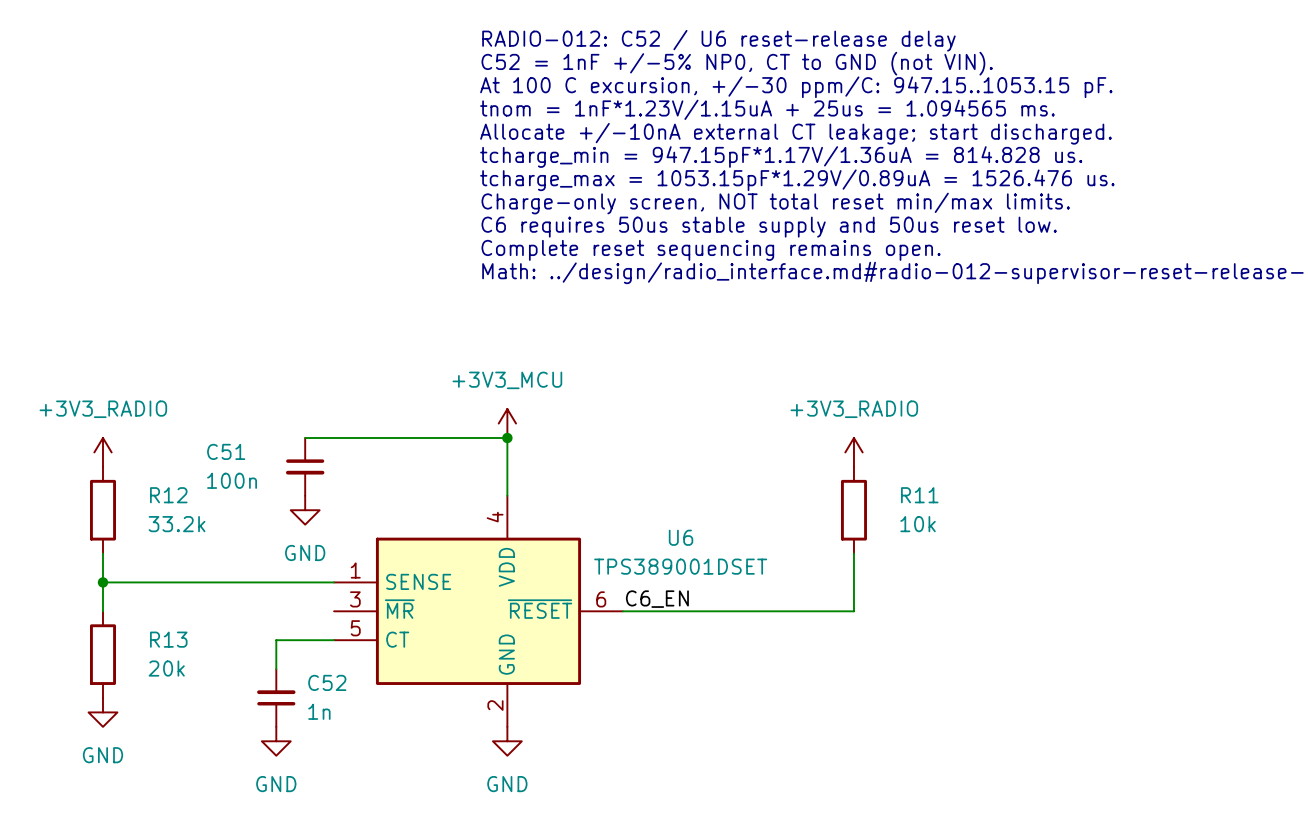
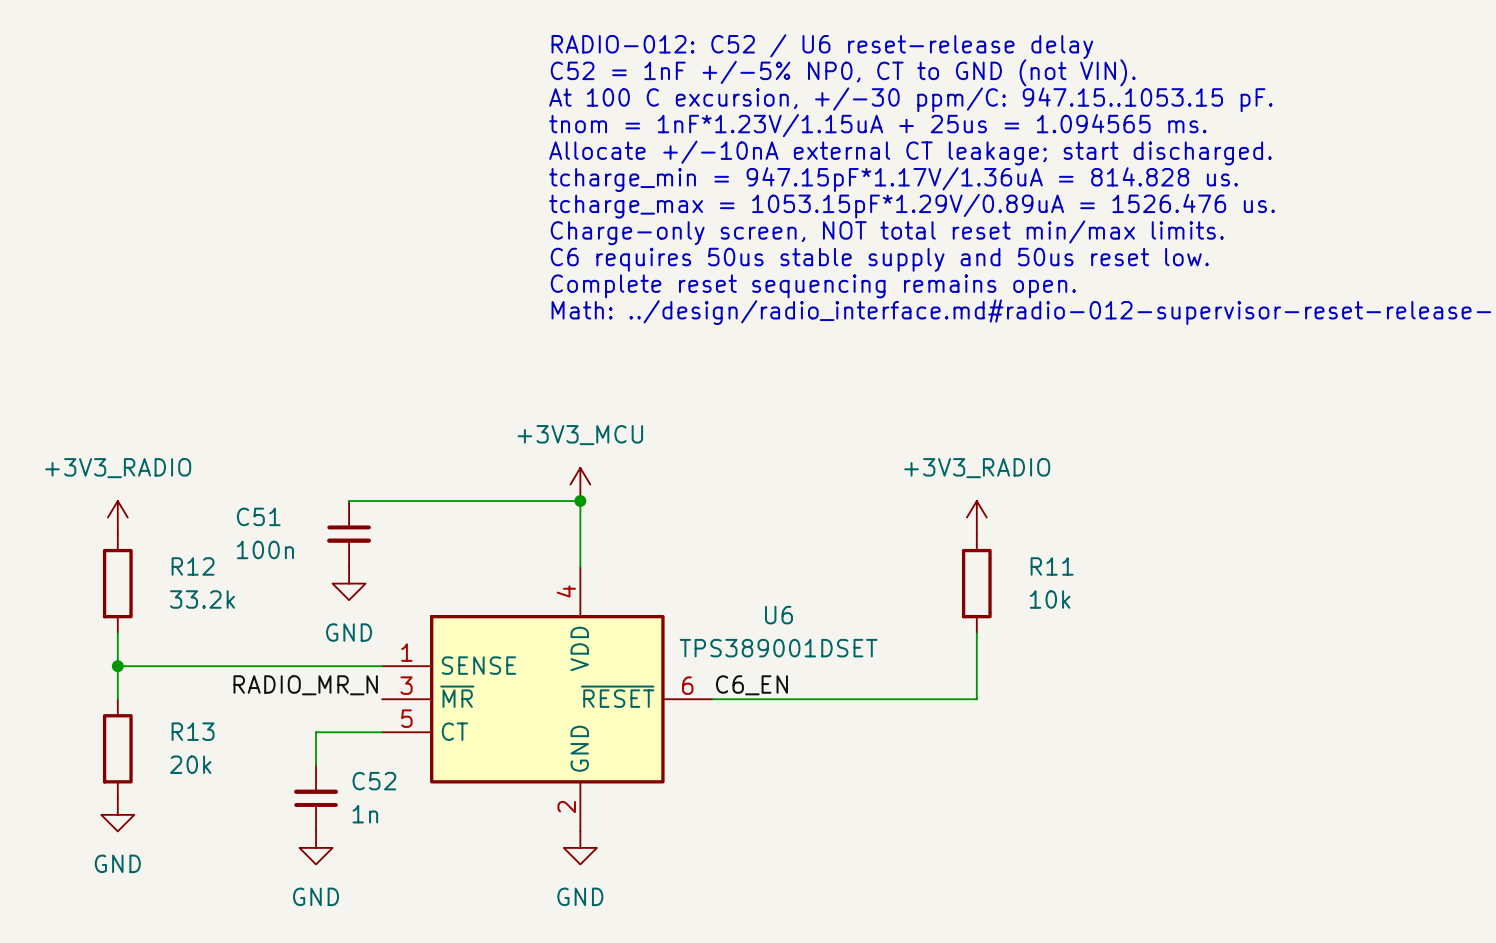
label: none -> RADIO_MR_N (305, 685)

